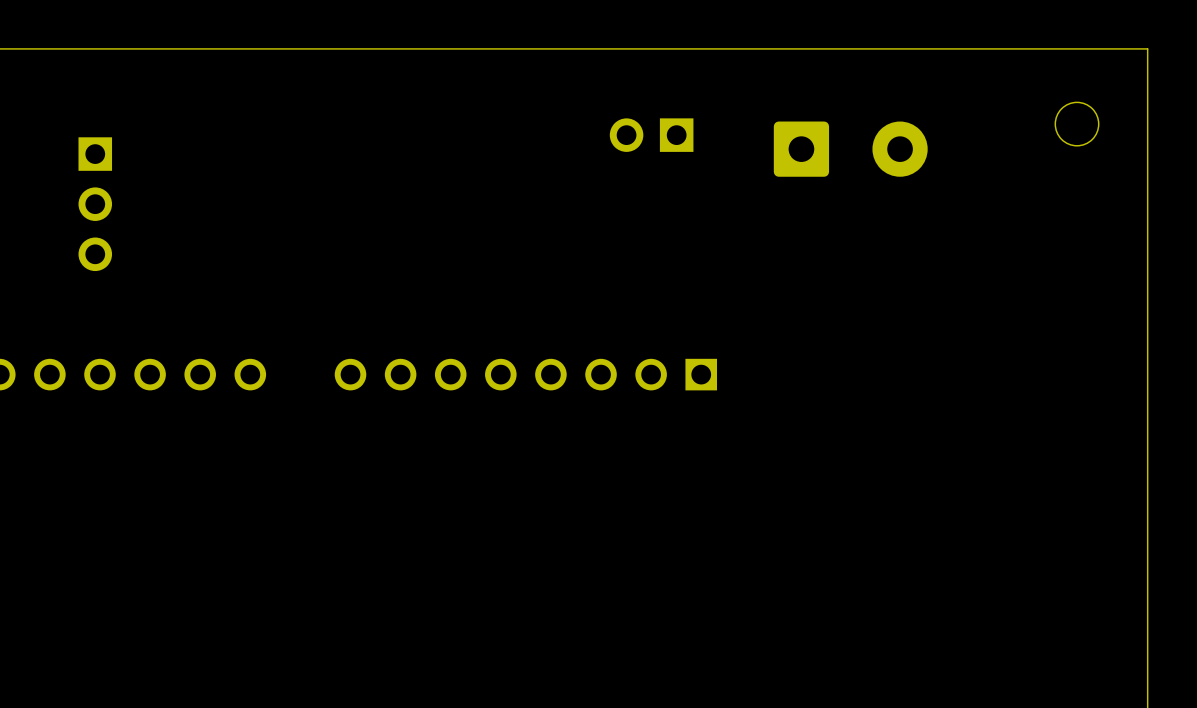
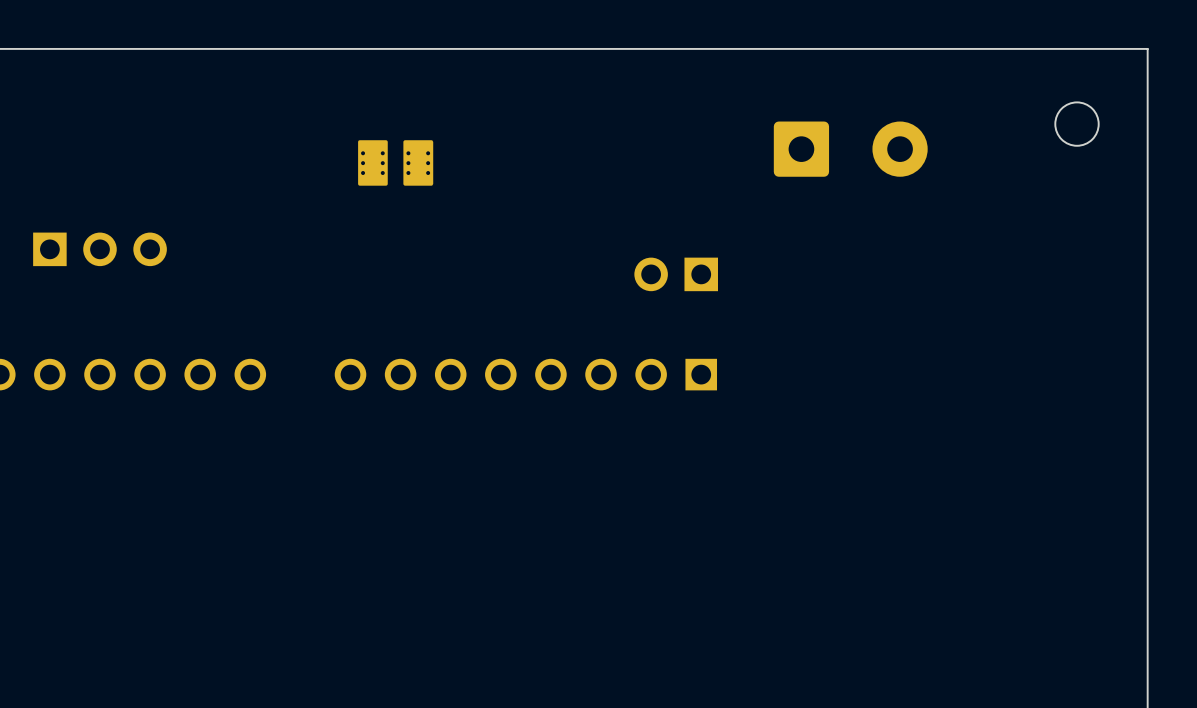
part position: (651, 135) -> (676, 274)
part: none -> (395, 162)
part rotation: 0° (95, 204) -> 90° counterclockwise (100, 249)

